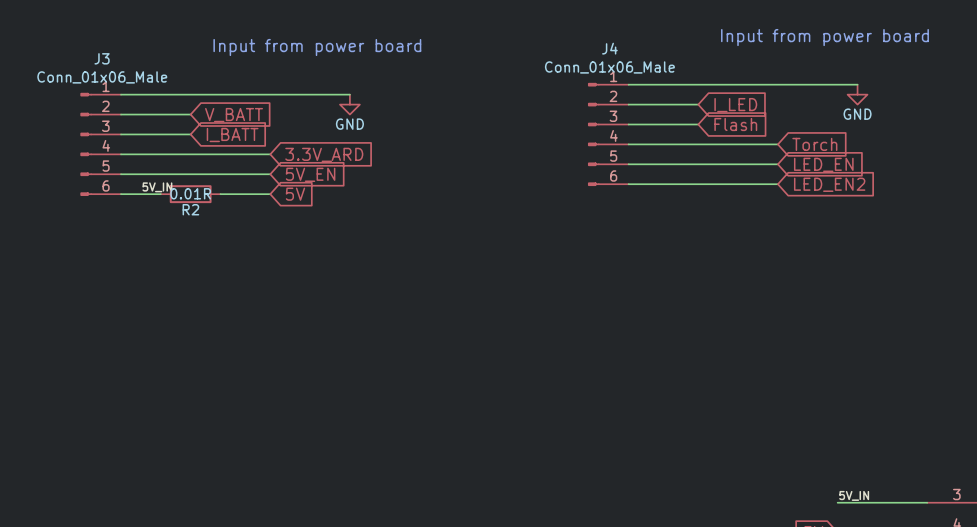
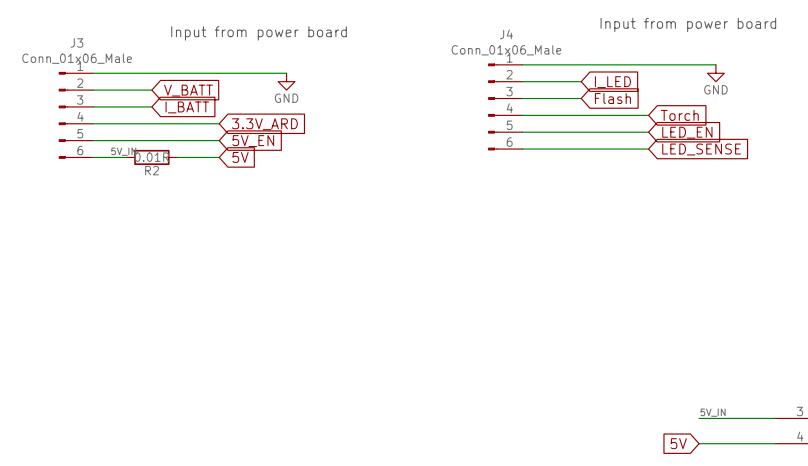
global label: LED_EN2 (829, 184) -> LED_SENSE (701, 149)

